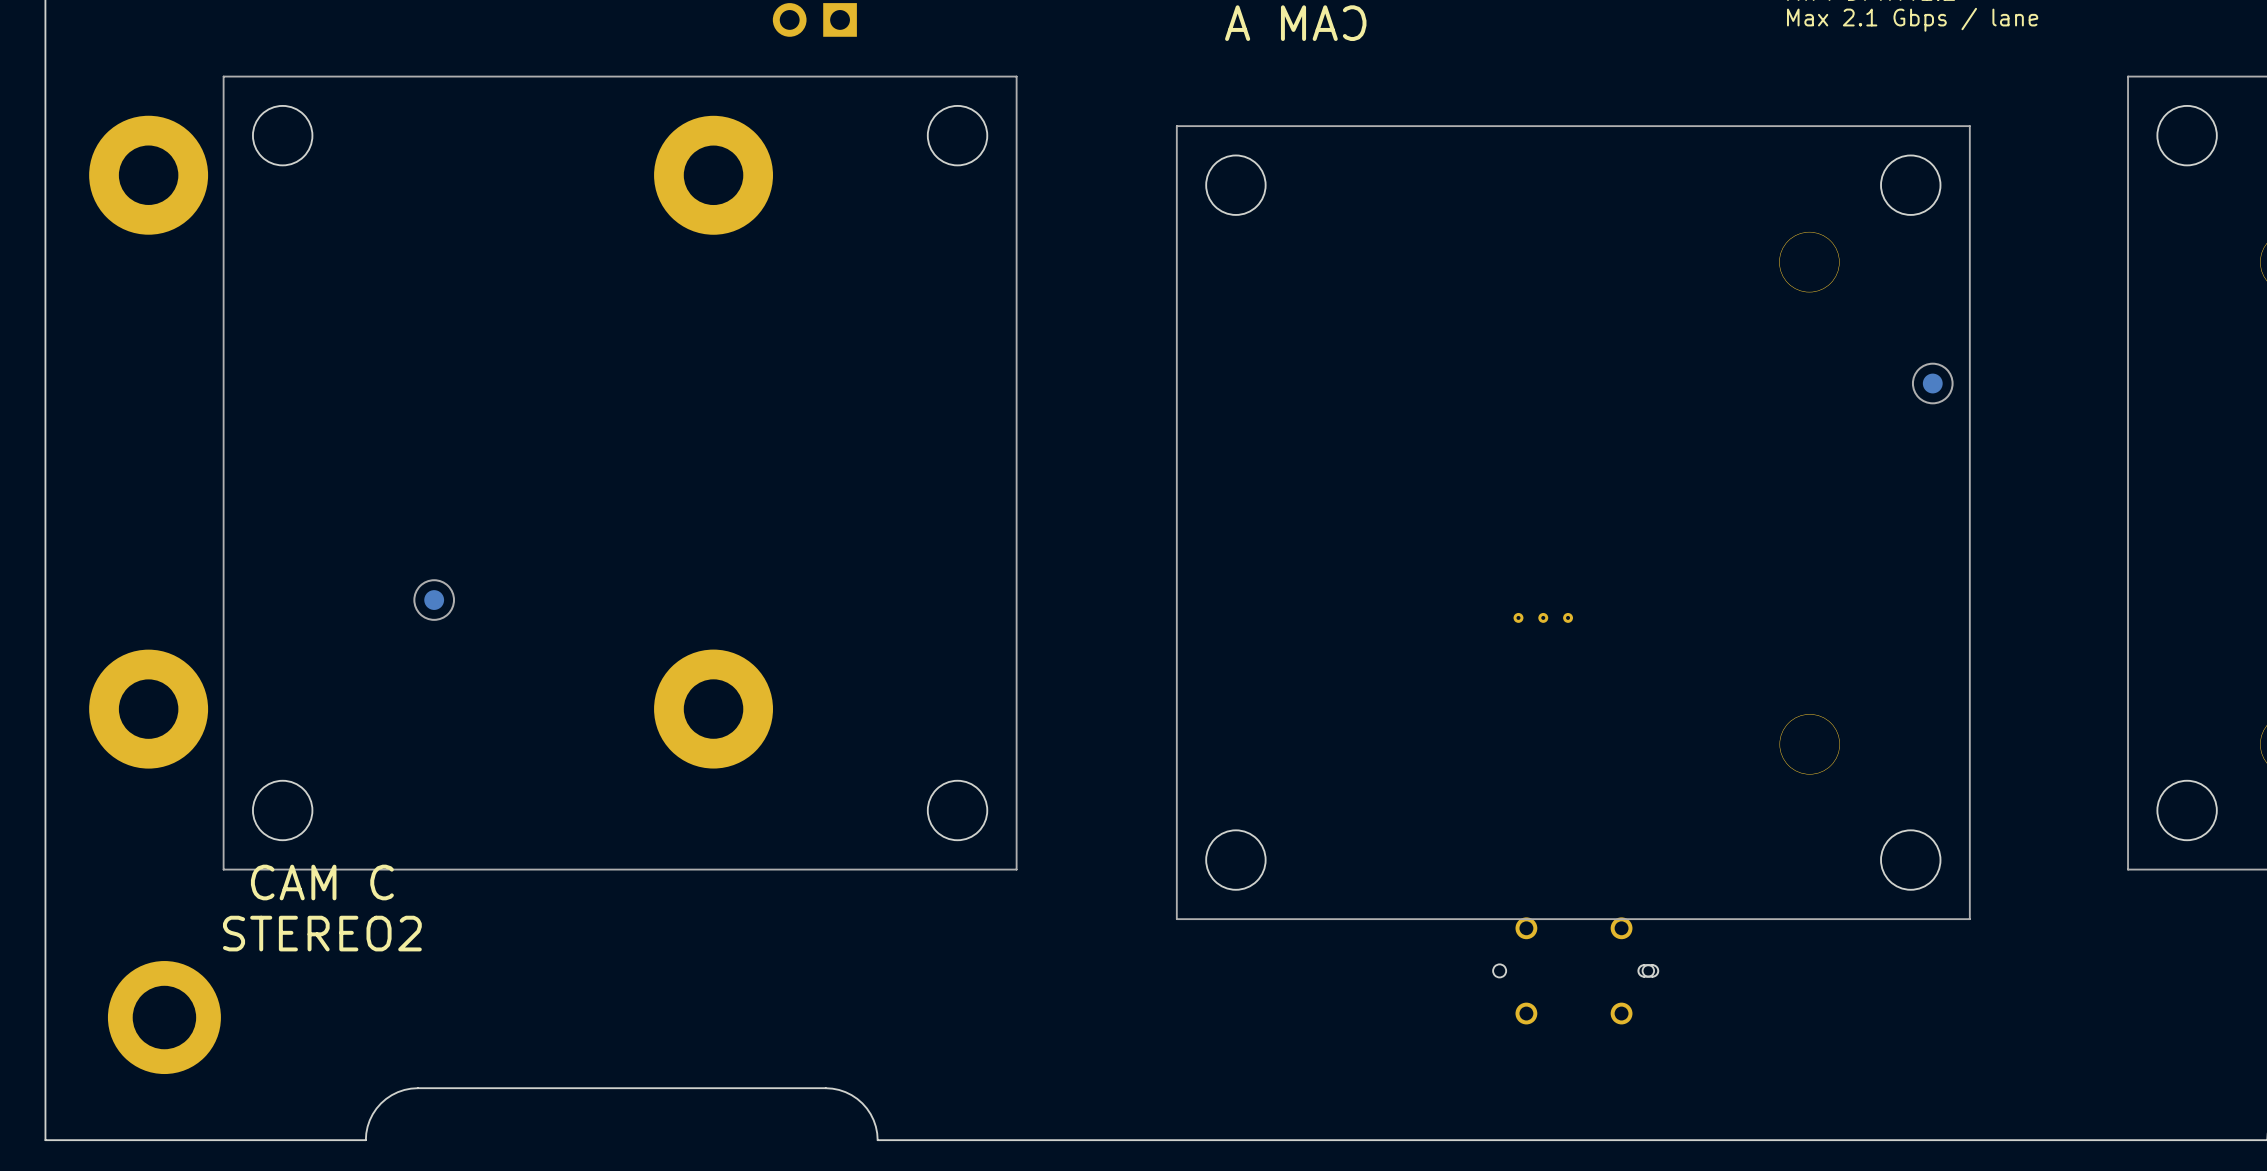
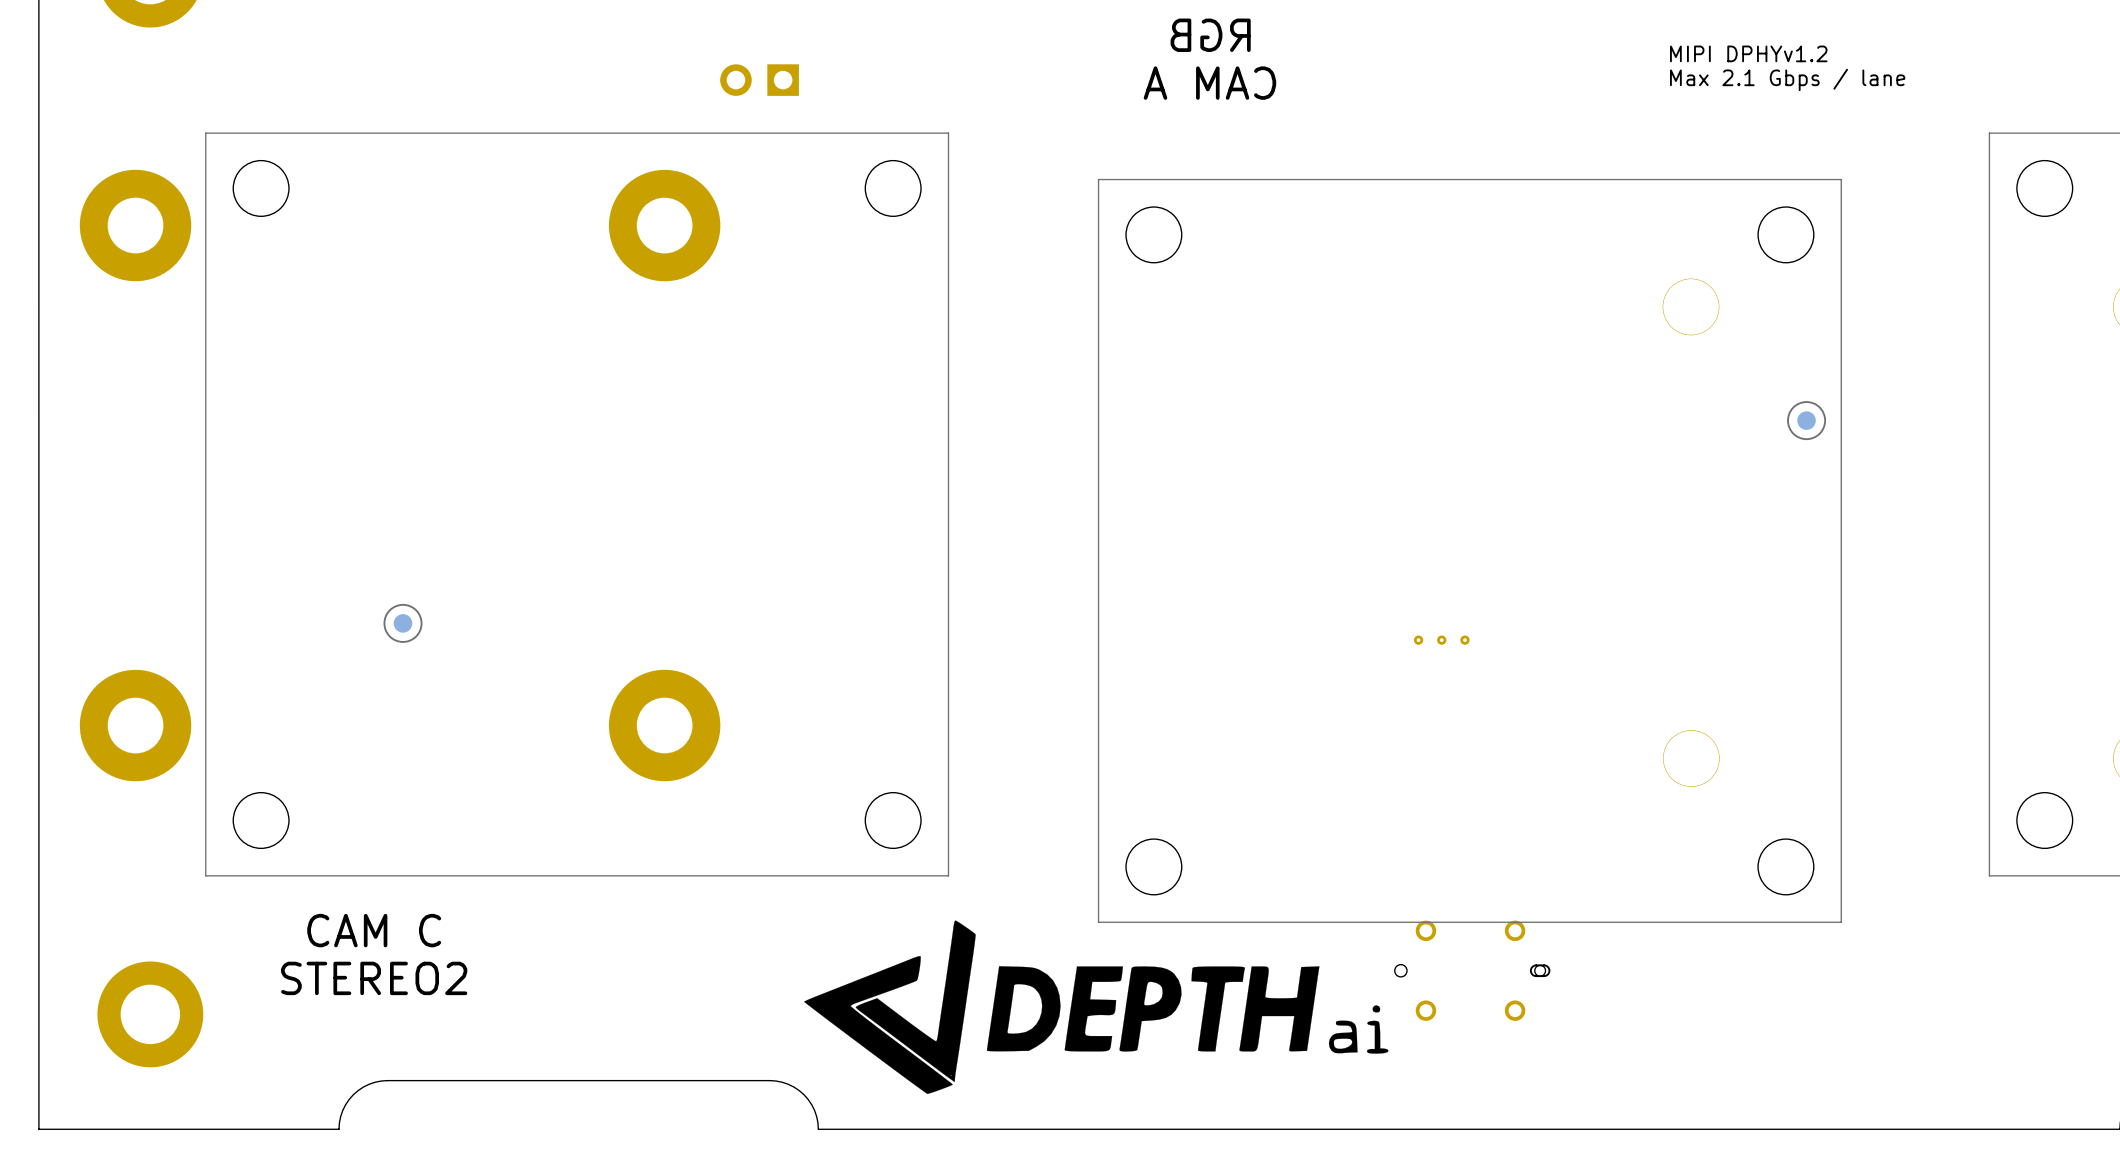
text position: CAM C (322, 882) -> CAM C (374, 930)
drawing: none -> [804, 920, 1389, 1094]
text position: STEREO2 (322, 933) -> STEREO2 (374, 978)

